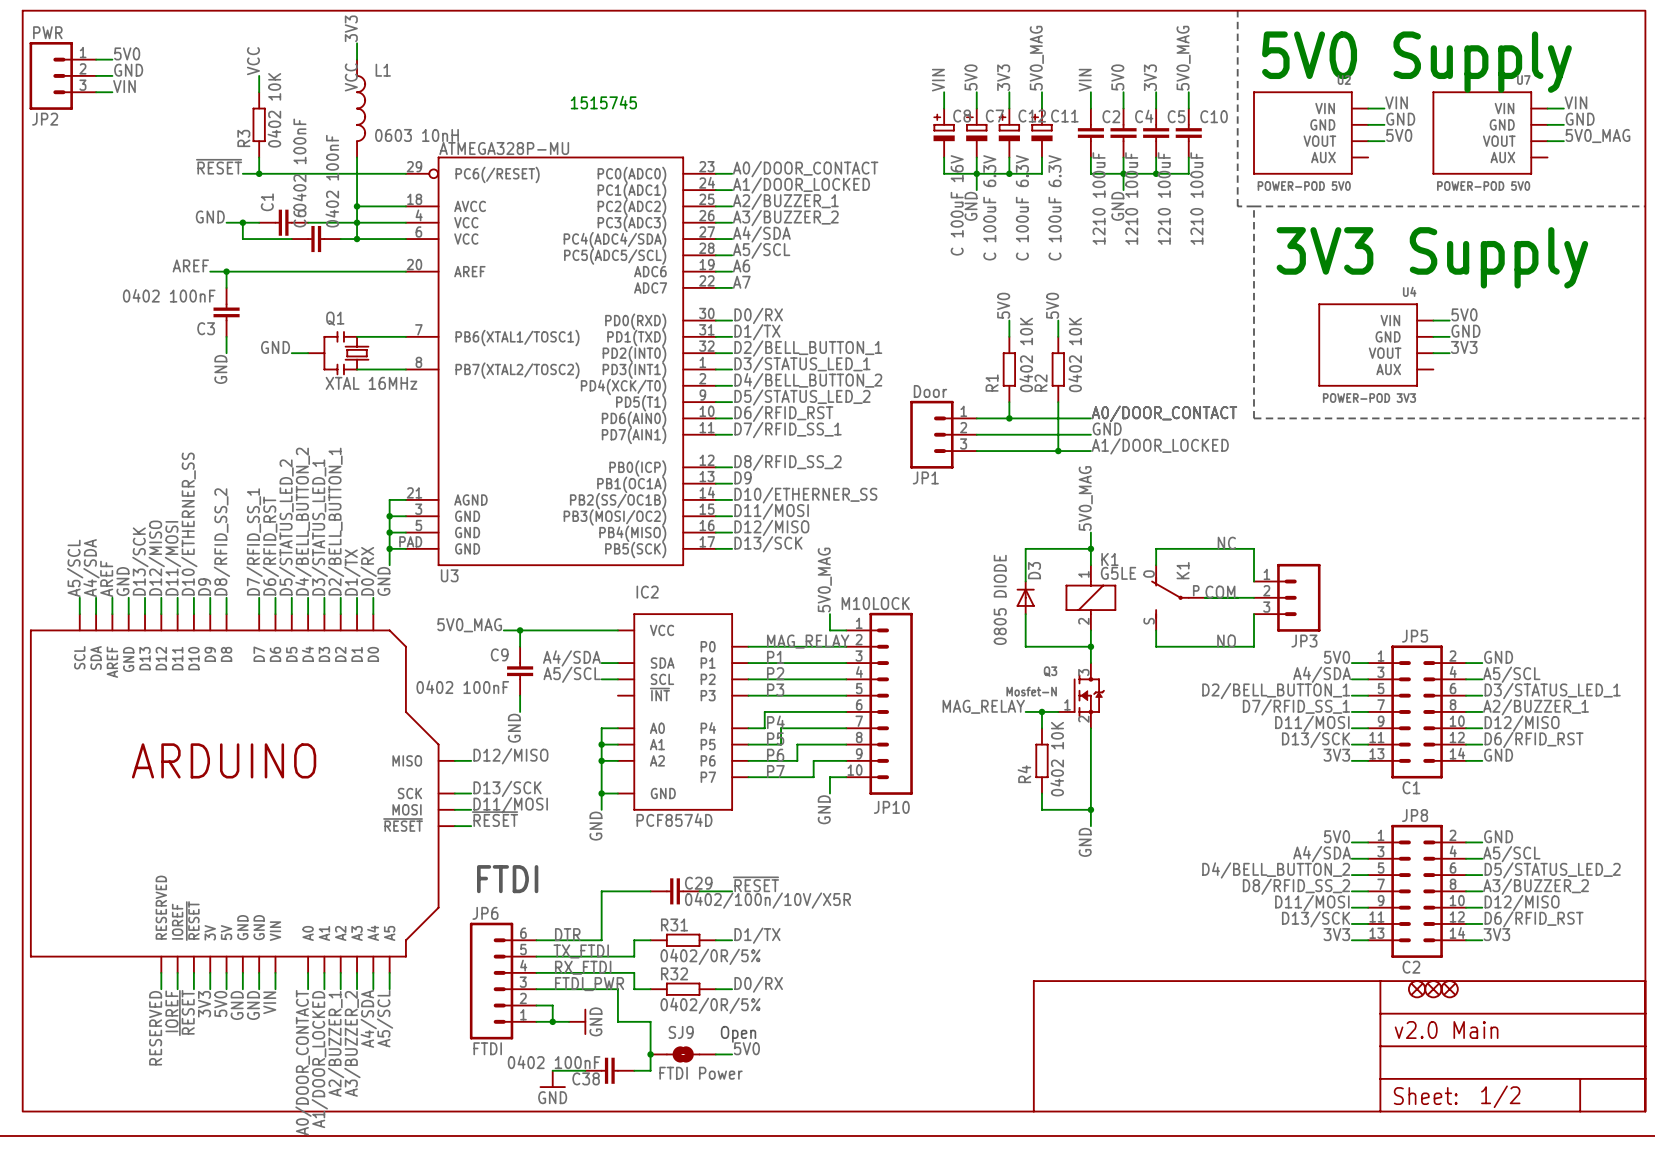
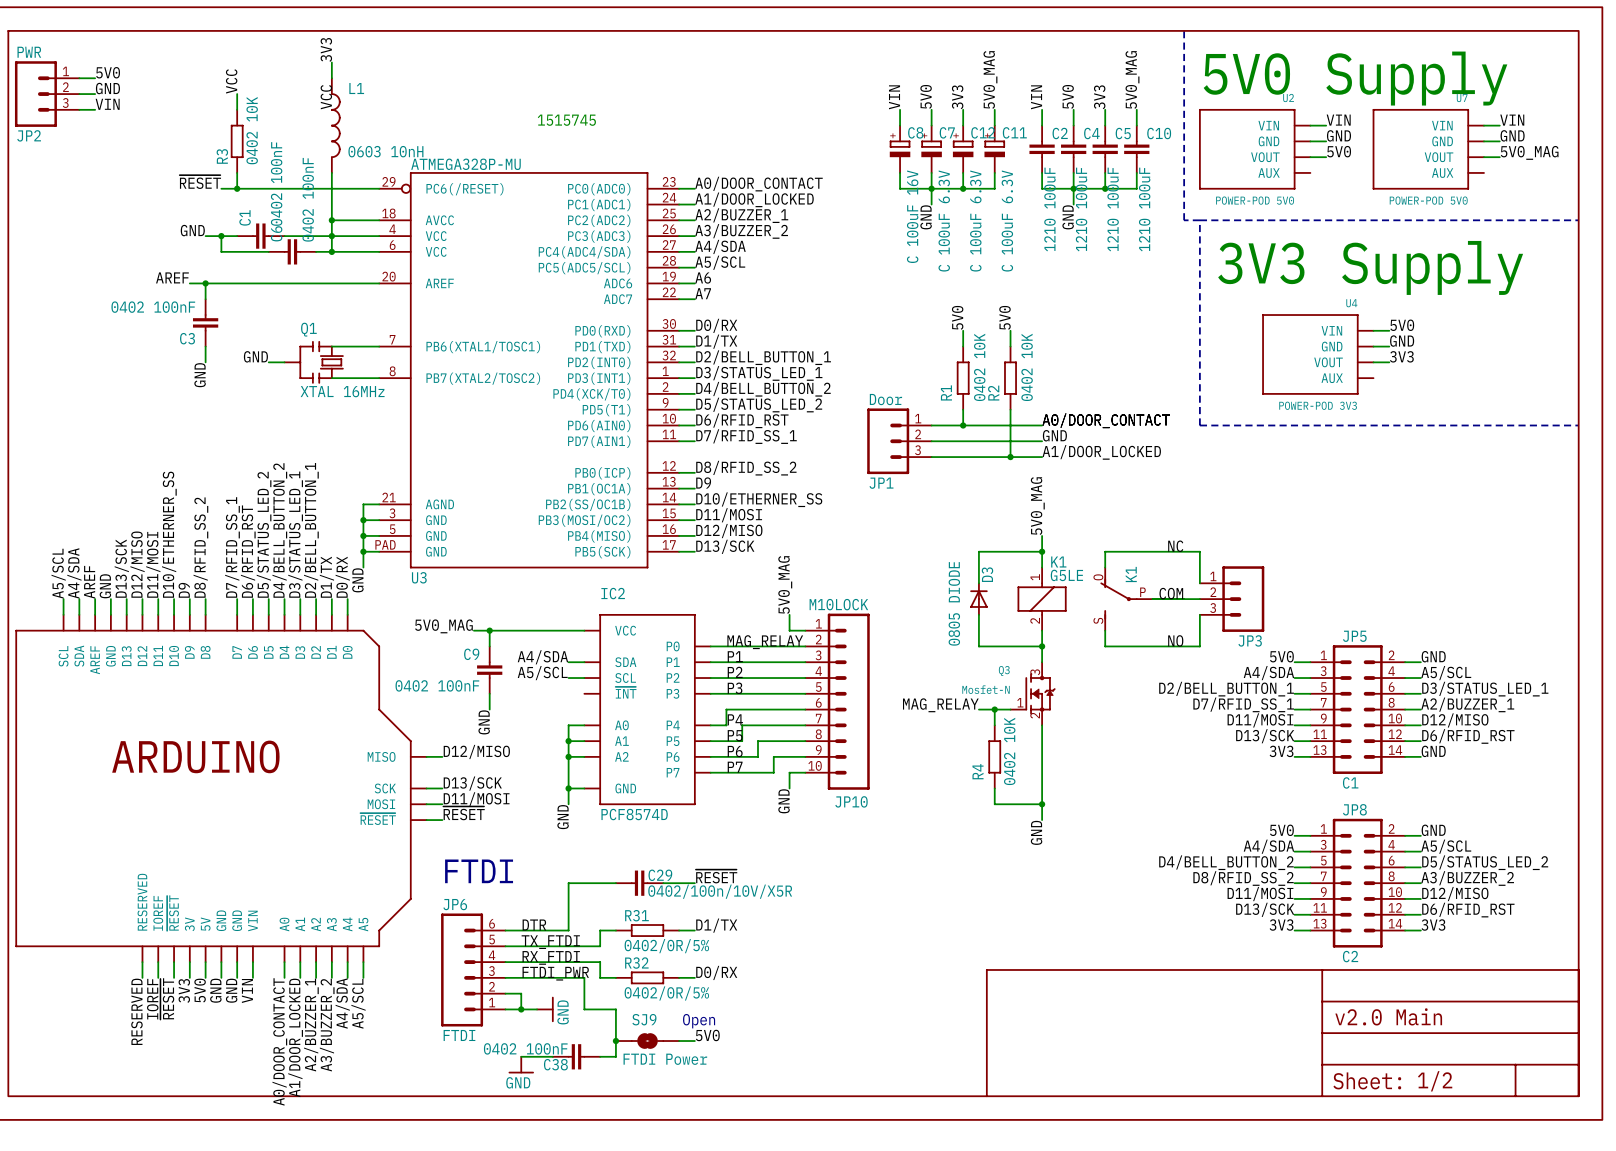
part: (1417, 989) -> none
part: (1433, 989) -> none
part: (1449, 989) -> none

